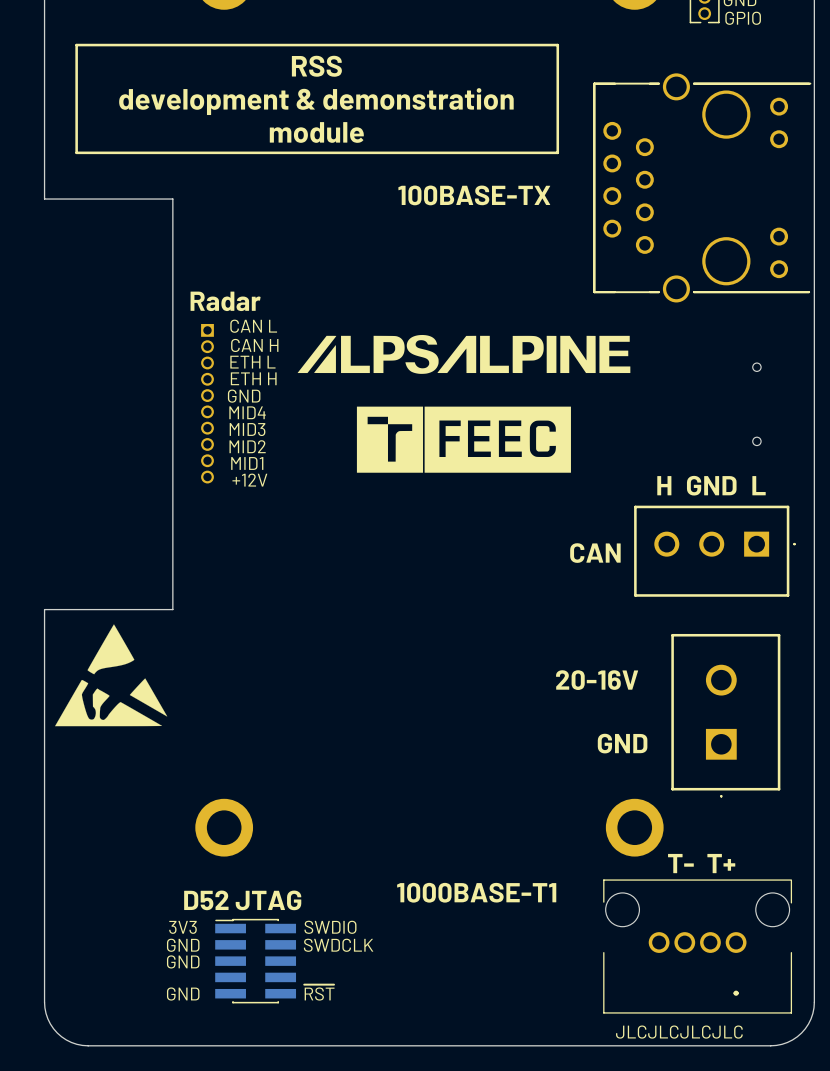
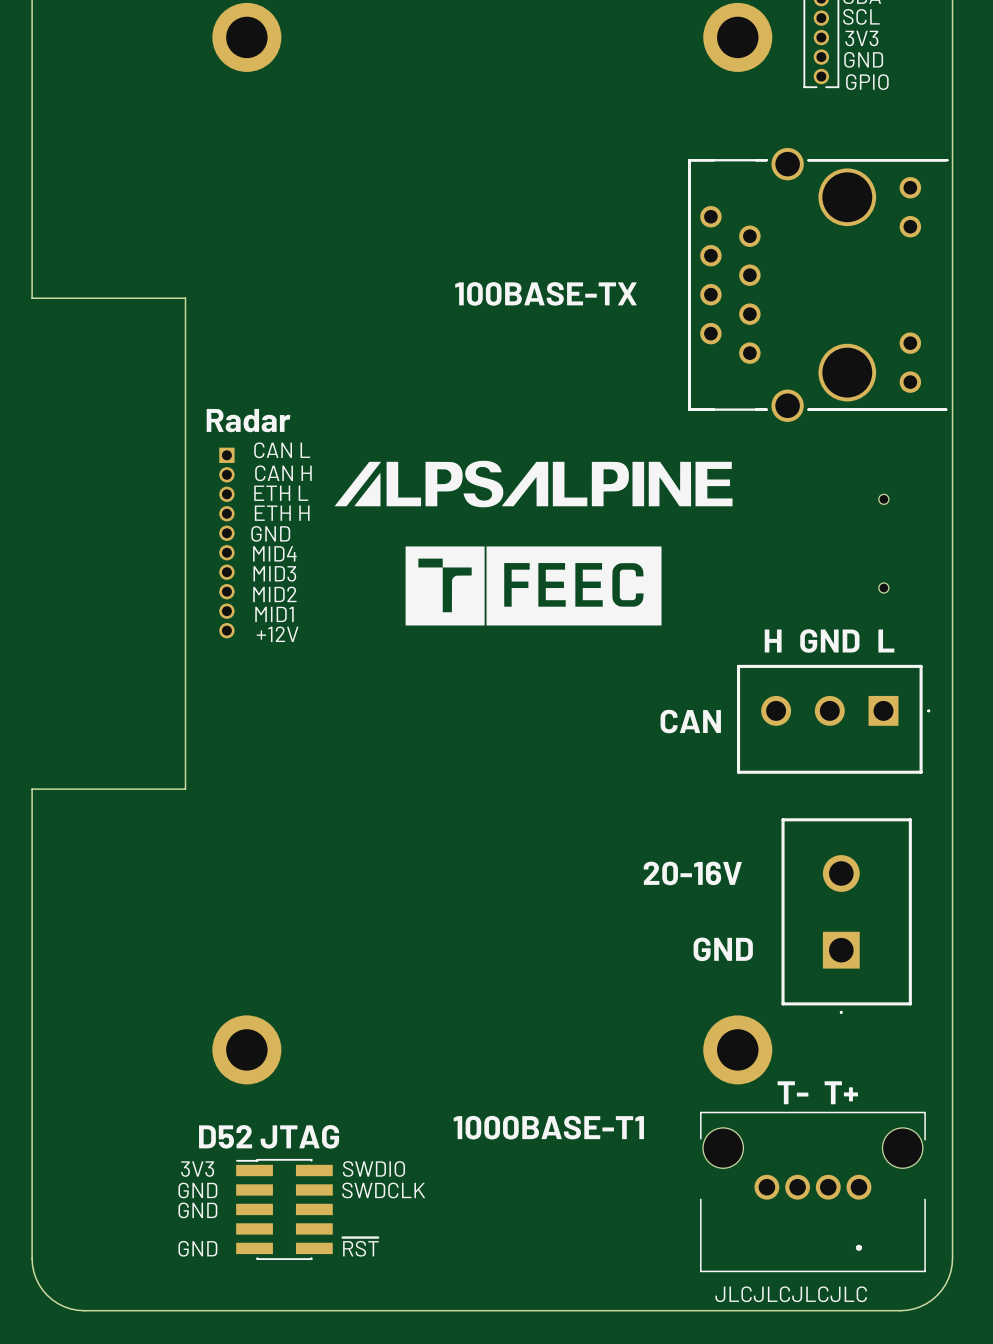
line: (557, 45) (76, 45) (76, 152) (557, 152) (557, 45) -> none
text: RSS (316, 66) -> none
text: development & demonstration (316, 101) -> none
text: module (316, 132) -> none
drawing: [55, 624, 168, 727] -> none

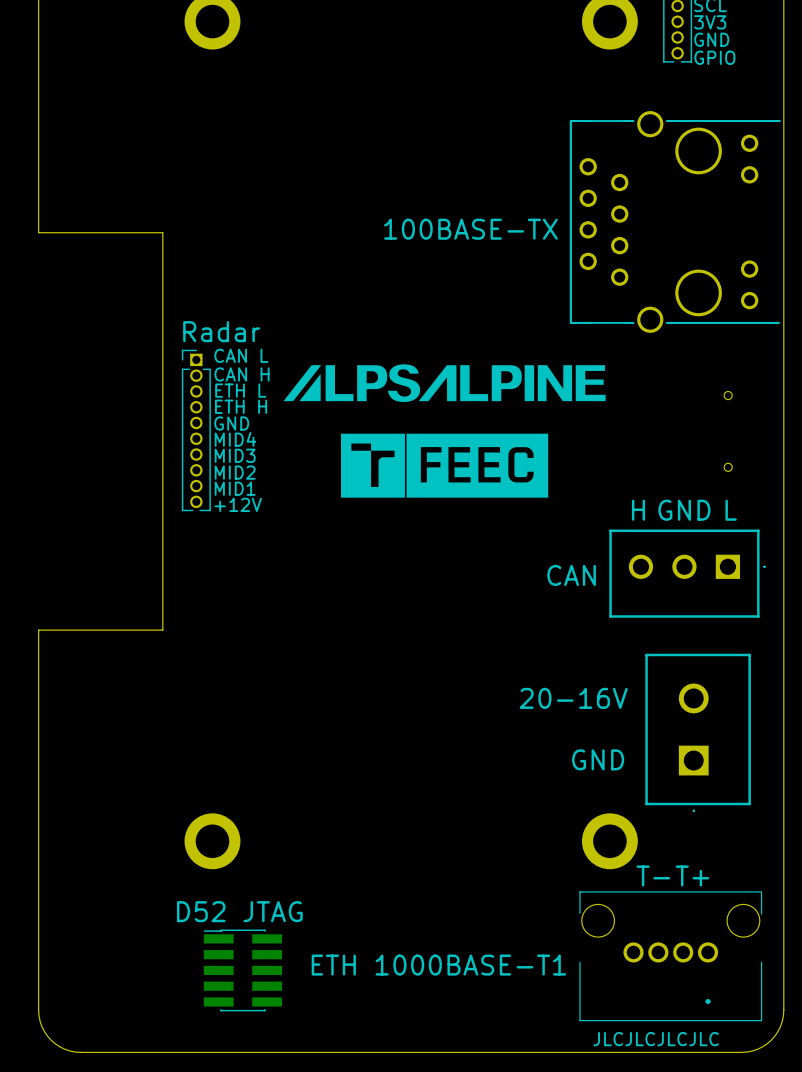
part footprint: [219, 447, 235, 639] -> [181, 349, 211, 512]
text: 1000BASE-T1 (548, 1127) -> none
text: 3V3 (197, 1169) -> none
text: SWDIO (373, 1169) -> none
text: GND (197, 1190) -> none
text: SWDCLK (383, 1190) -> none
text: none -> ETH 1000BASE-T1 (438, 965)
text: GND (197, 1210) -> none
text: ~{RST} (360, 1247) -> none
text: GND (197, 1248) -> none

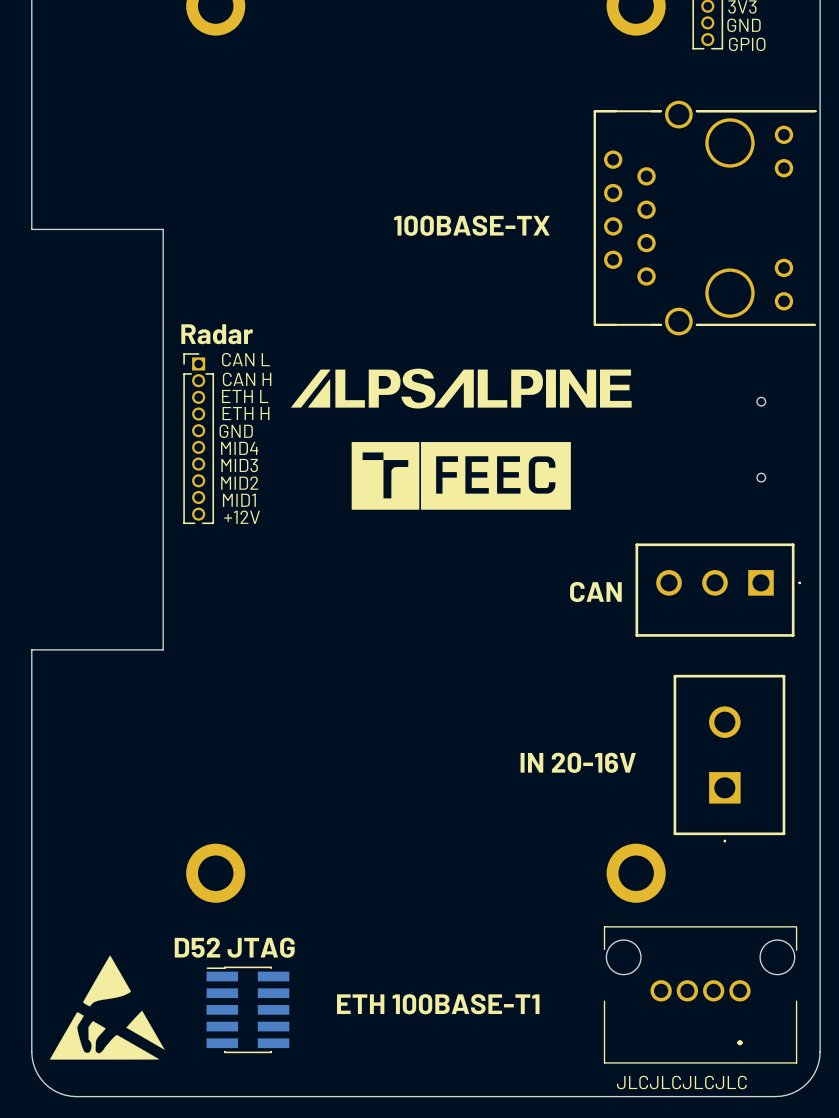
text: H (638, 510) -> none
text: GND (684, 510) -> none
text: L (731, 510) -> none
text: 20-16V (573, 698) -> IN 20-16V (578, 762)
text: GND (598, 759) -> none
text: T- (653, 875) -> none
text: T+ (692, 875) -> none
drawing: none -> [49, 955, 165, 1060]
text: ETH 1000BASE-T1 (438, 965) -> ETH 100BASE-T1 (438, 1004)

